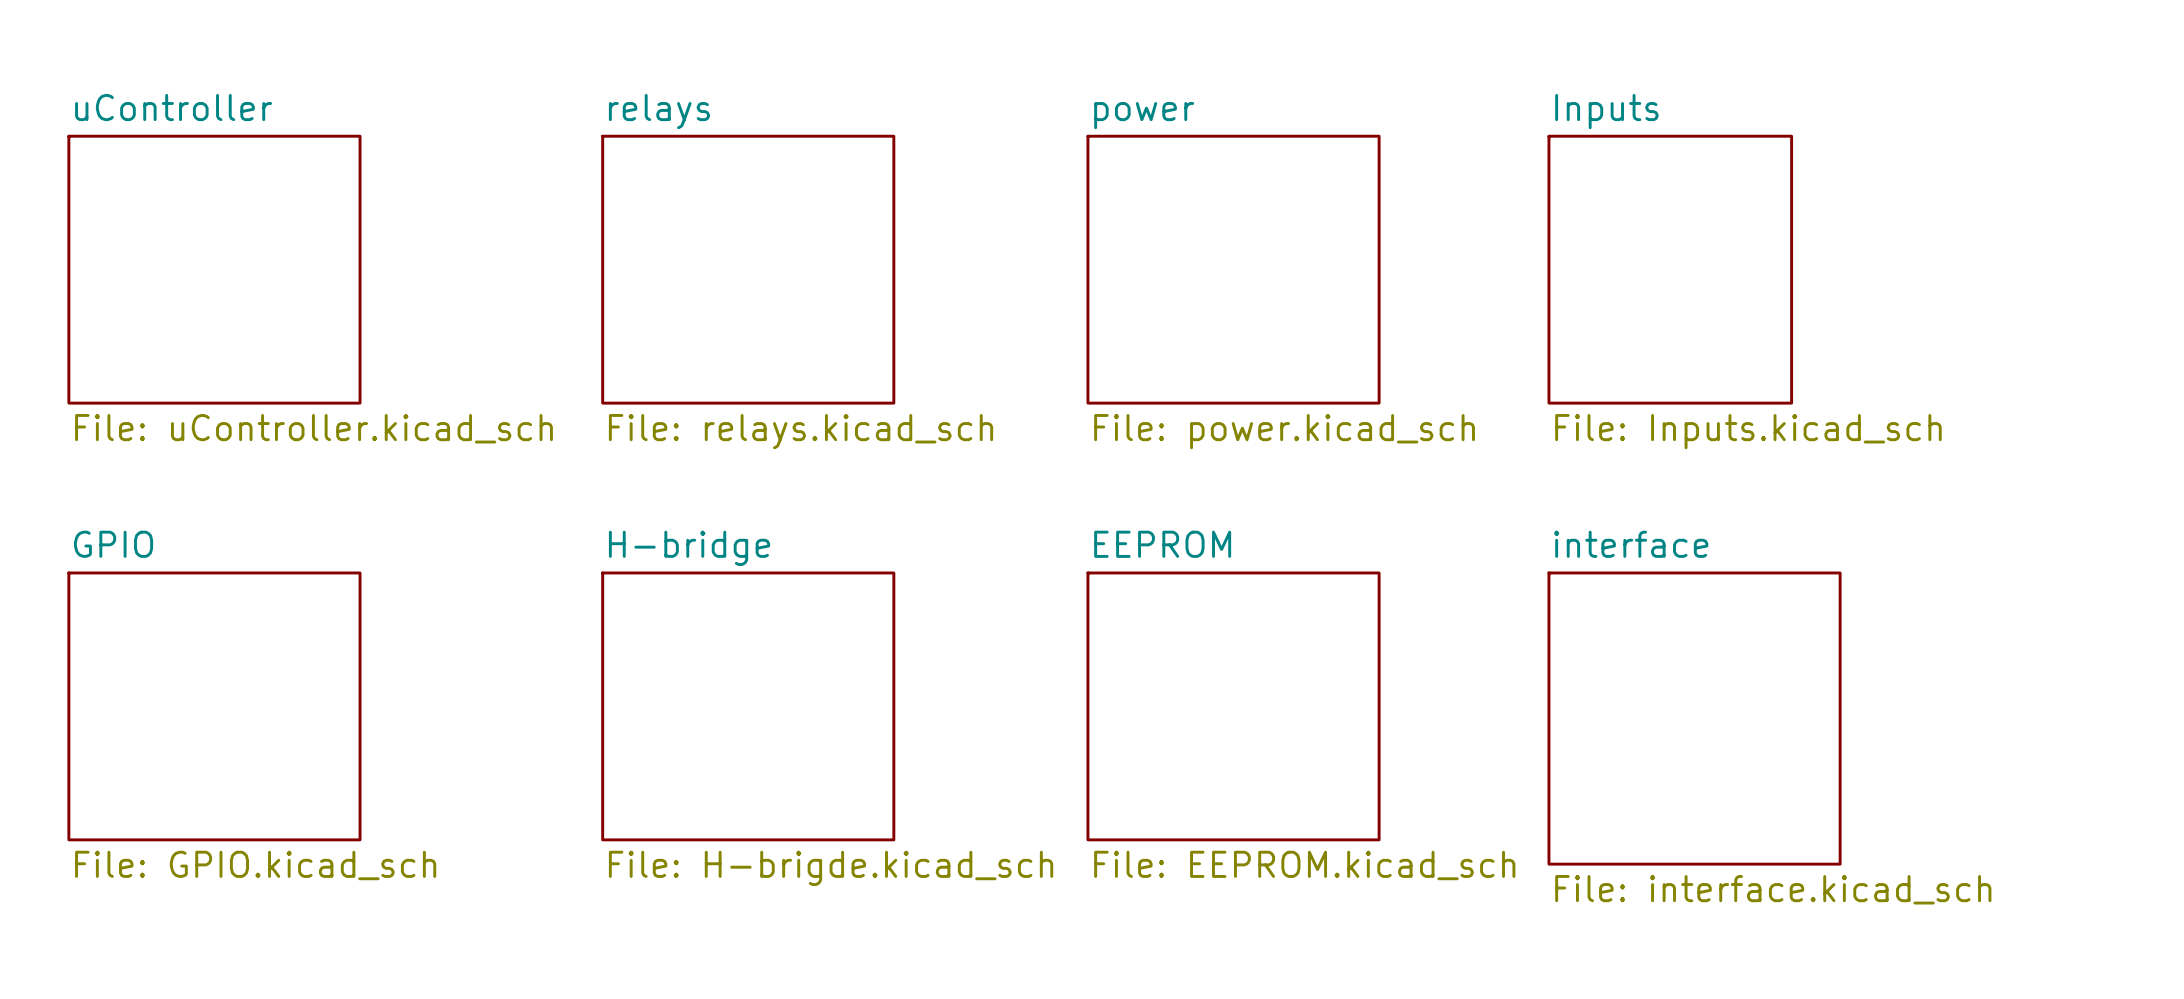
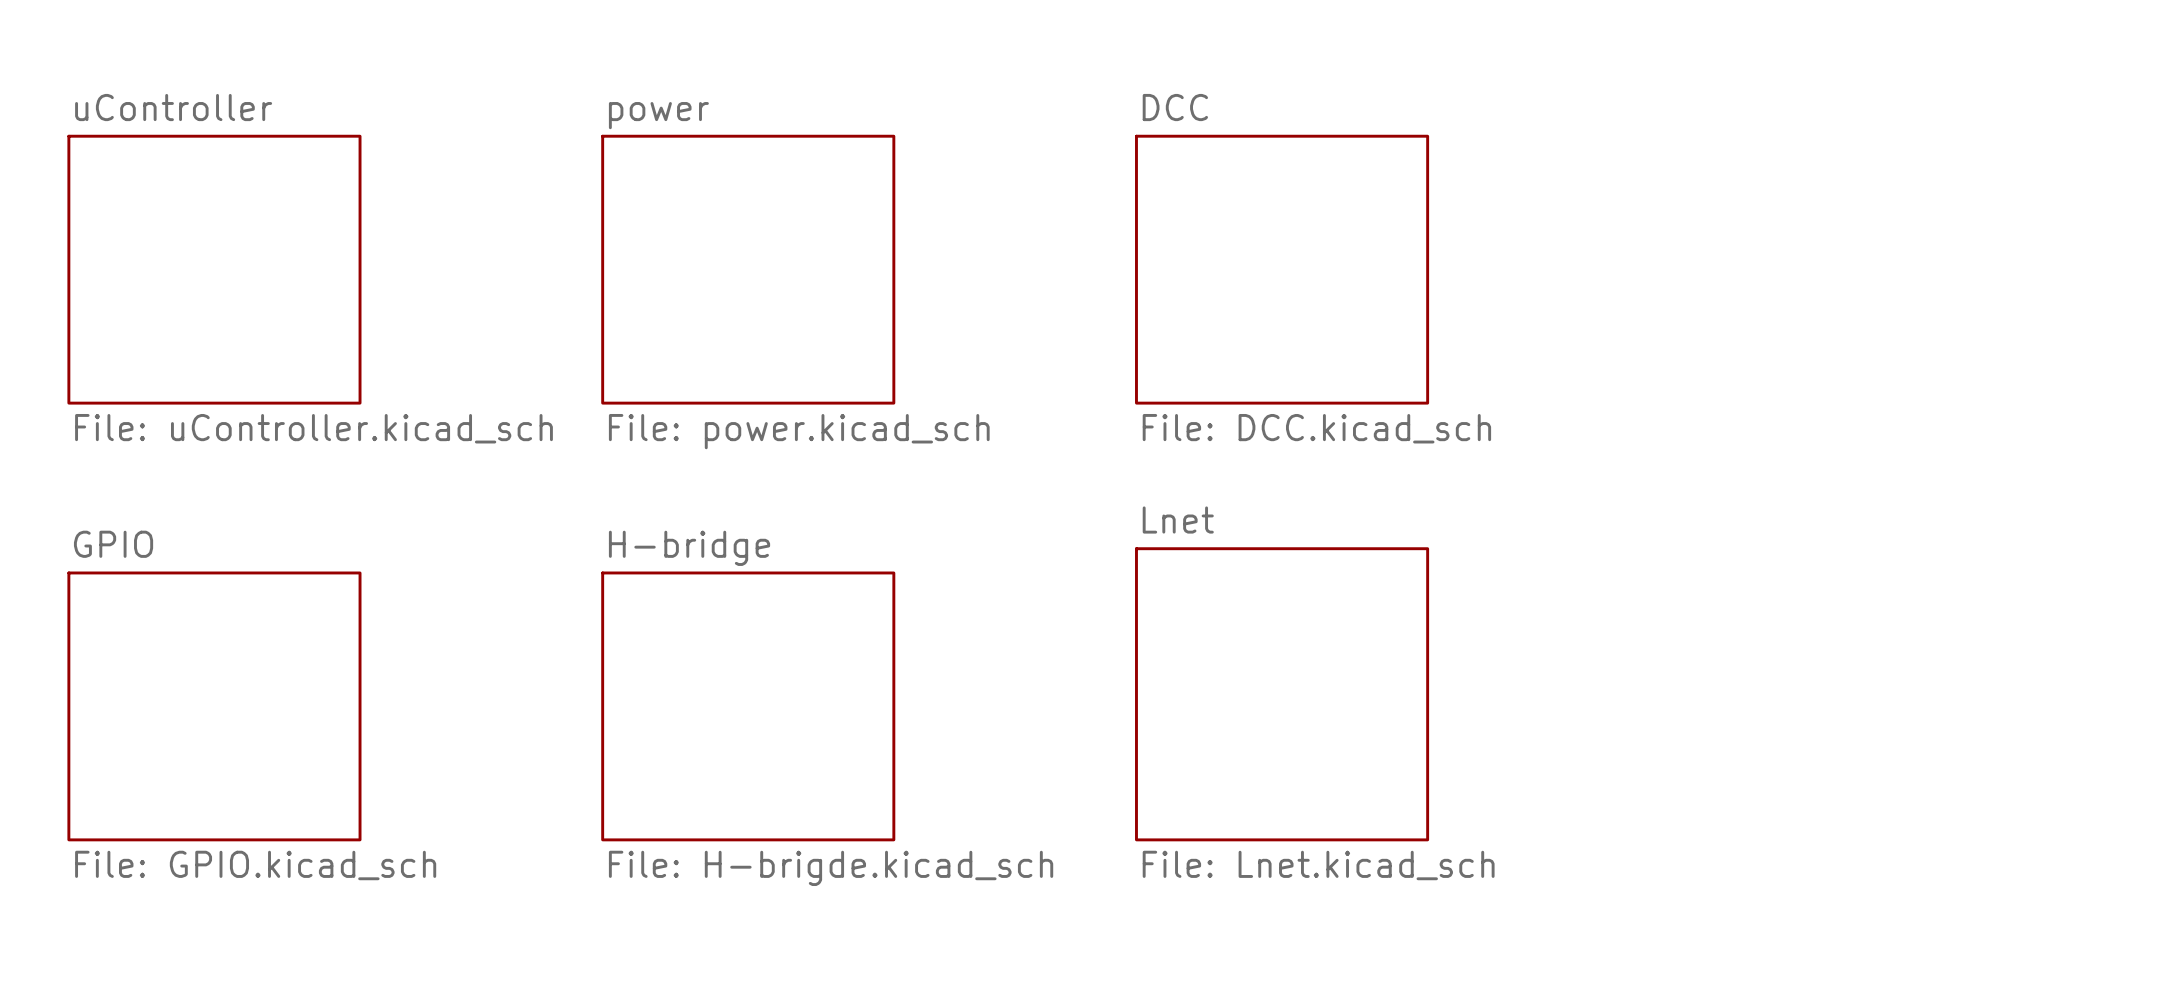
sheet relays name: relays (659, 111) -> power (658, 115)
sheet power: File: power.kicad_sch (1233, 269) -> none
sheet DCC: none -> File: DCC.kicad_sch (1282, 269)
sheet Inputs: File: Inputs.kicad_sch (1670, 269) -> none
sheet relays value: File: relays.kicad_sch (801, 431) -> File: power.kicad_sch (799, 431)
sheet Lnet: none -> File: Lnet.kicad_sch (1282, 694)
sheet EEPROM: File: EEPROM.kicad_sch (1233, 706) -> none
sheet interface: File: interface.kicad_sch (1694, 718) -> none

